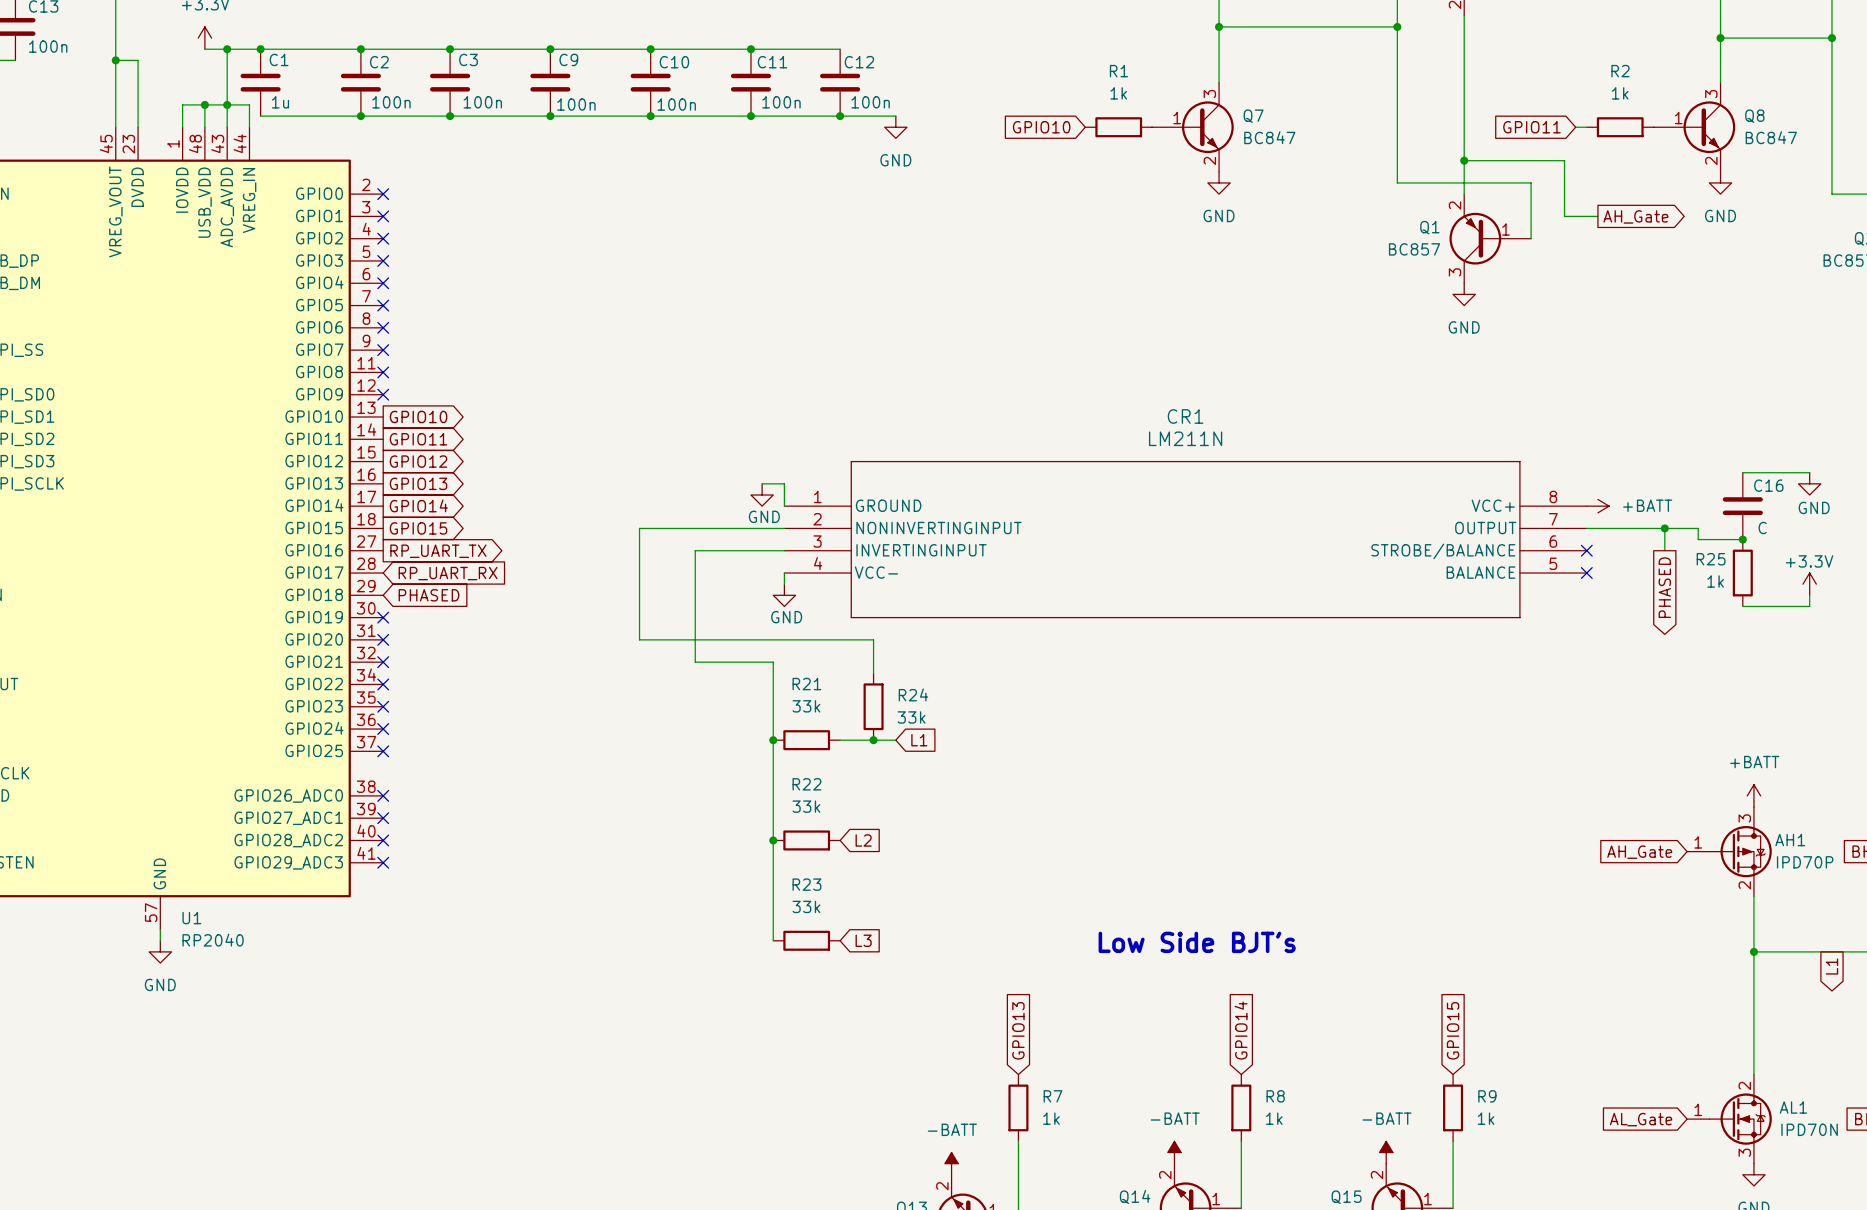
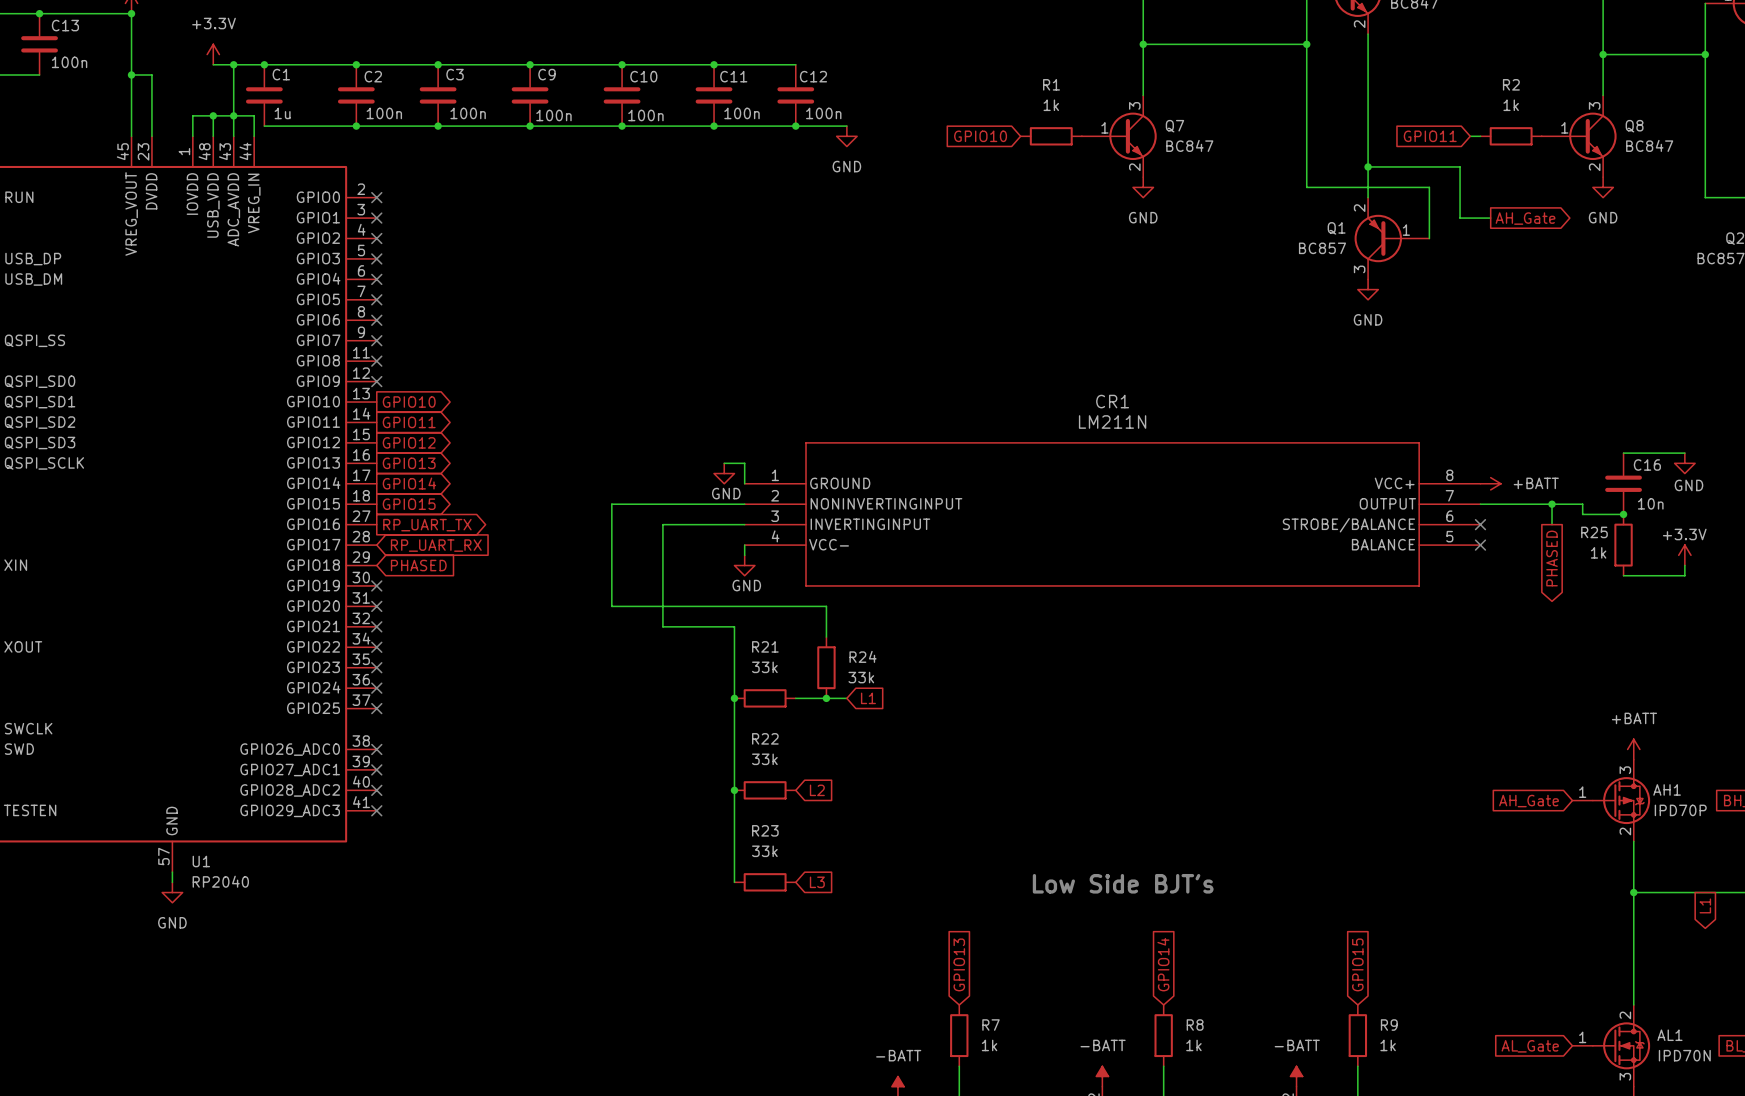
C16 value: C (1762, 528) -> 10n (1650, 503)

